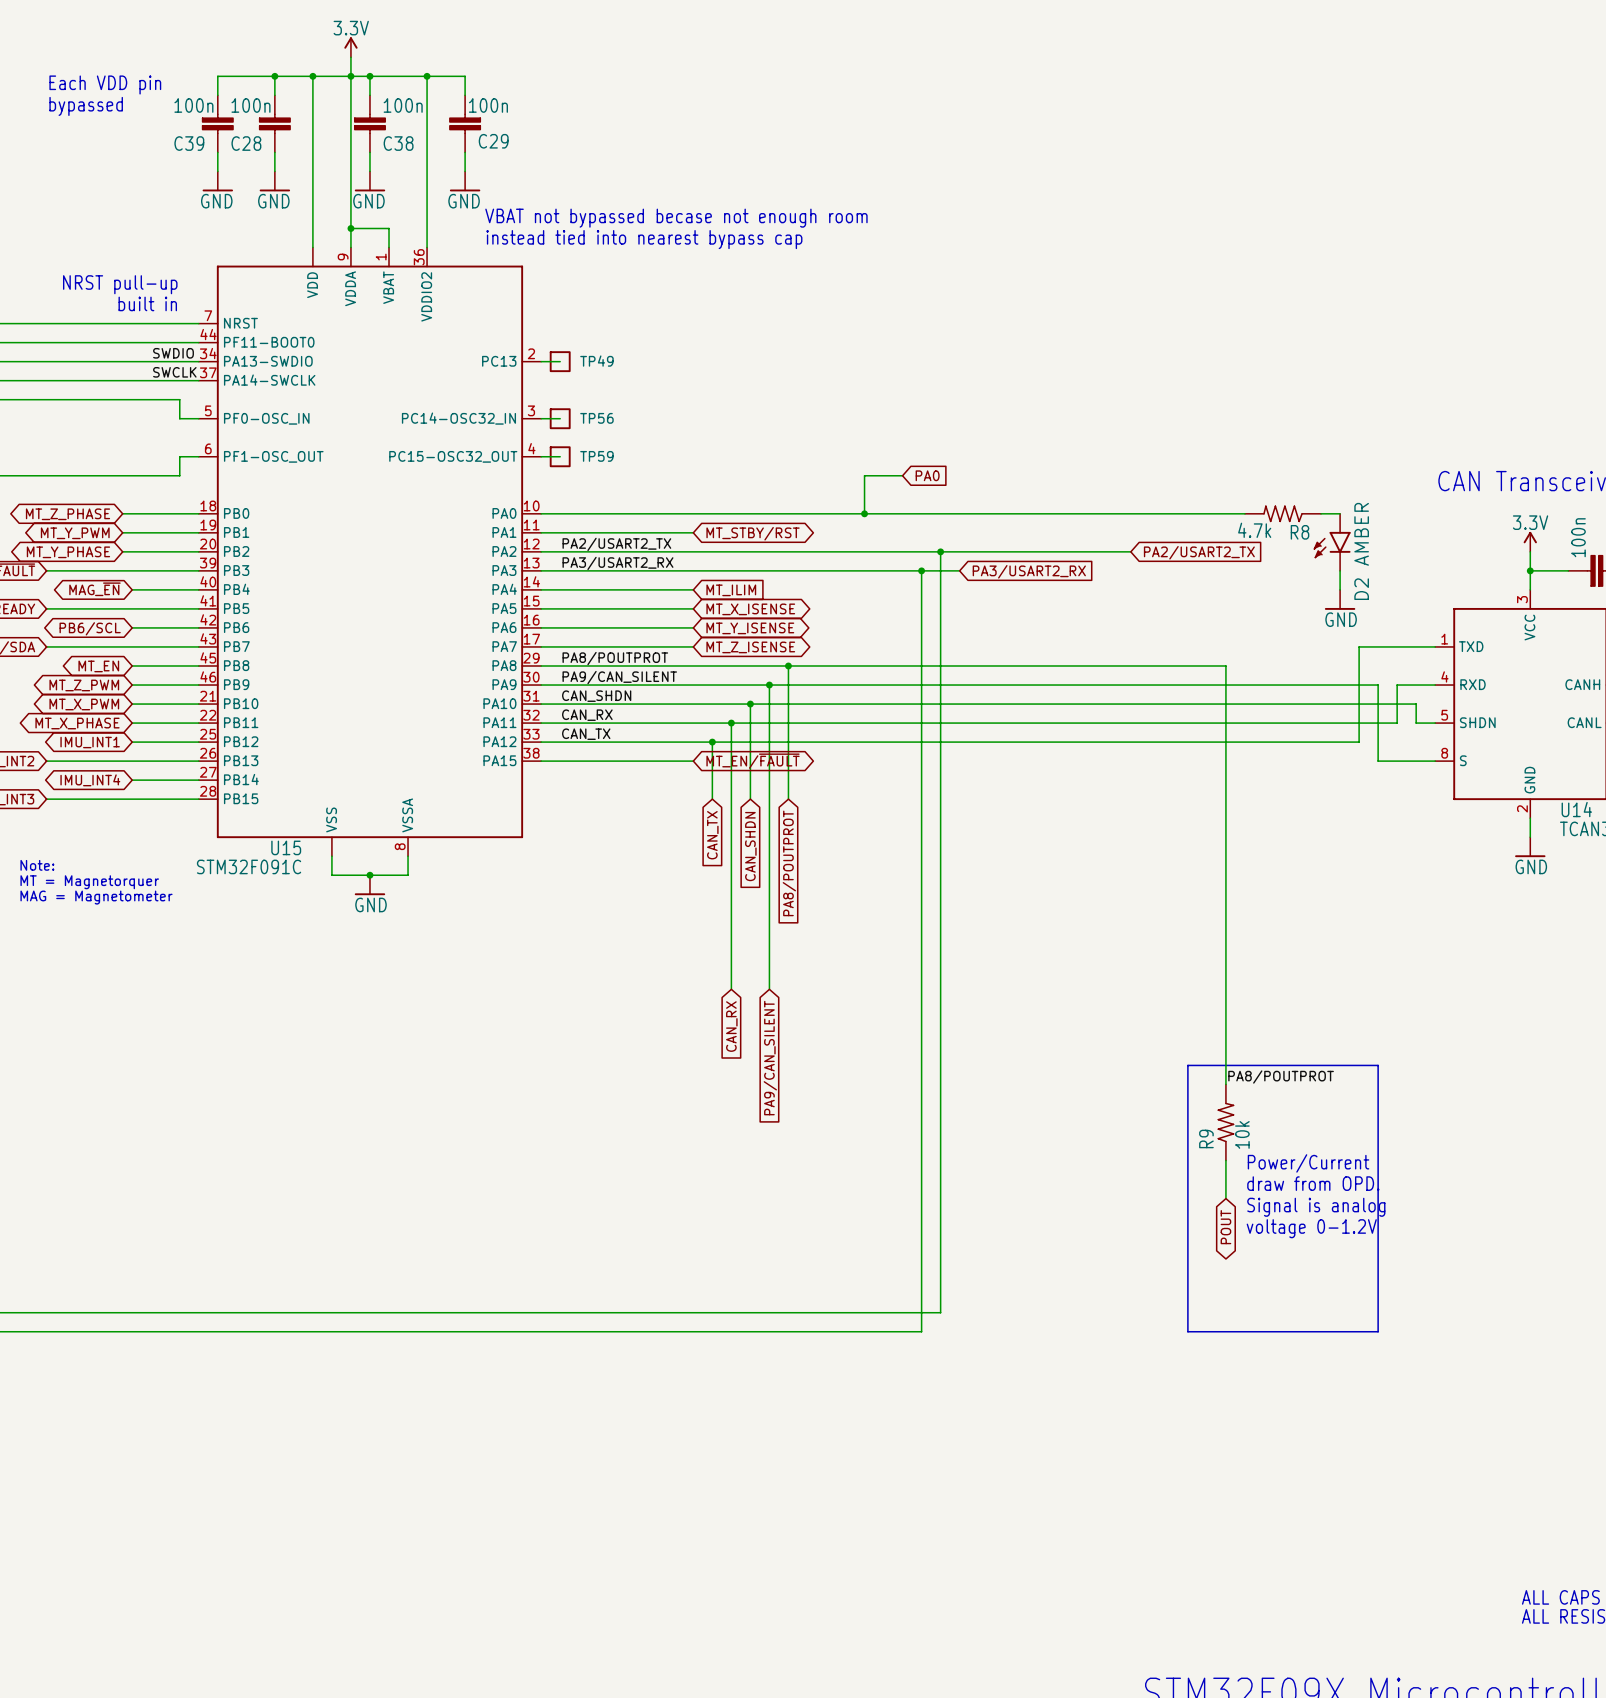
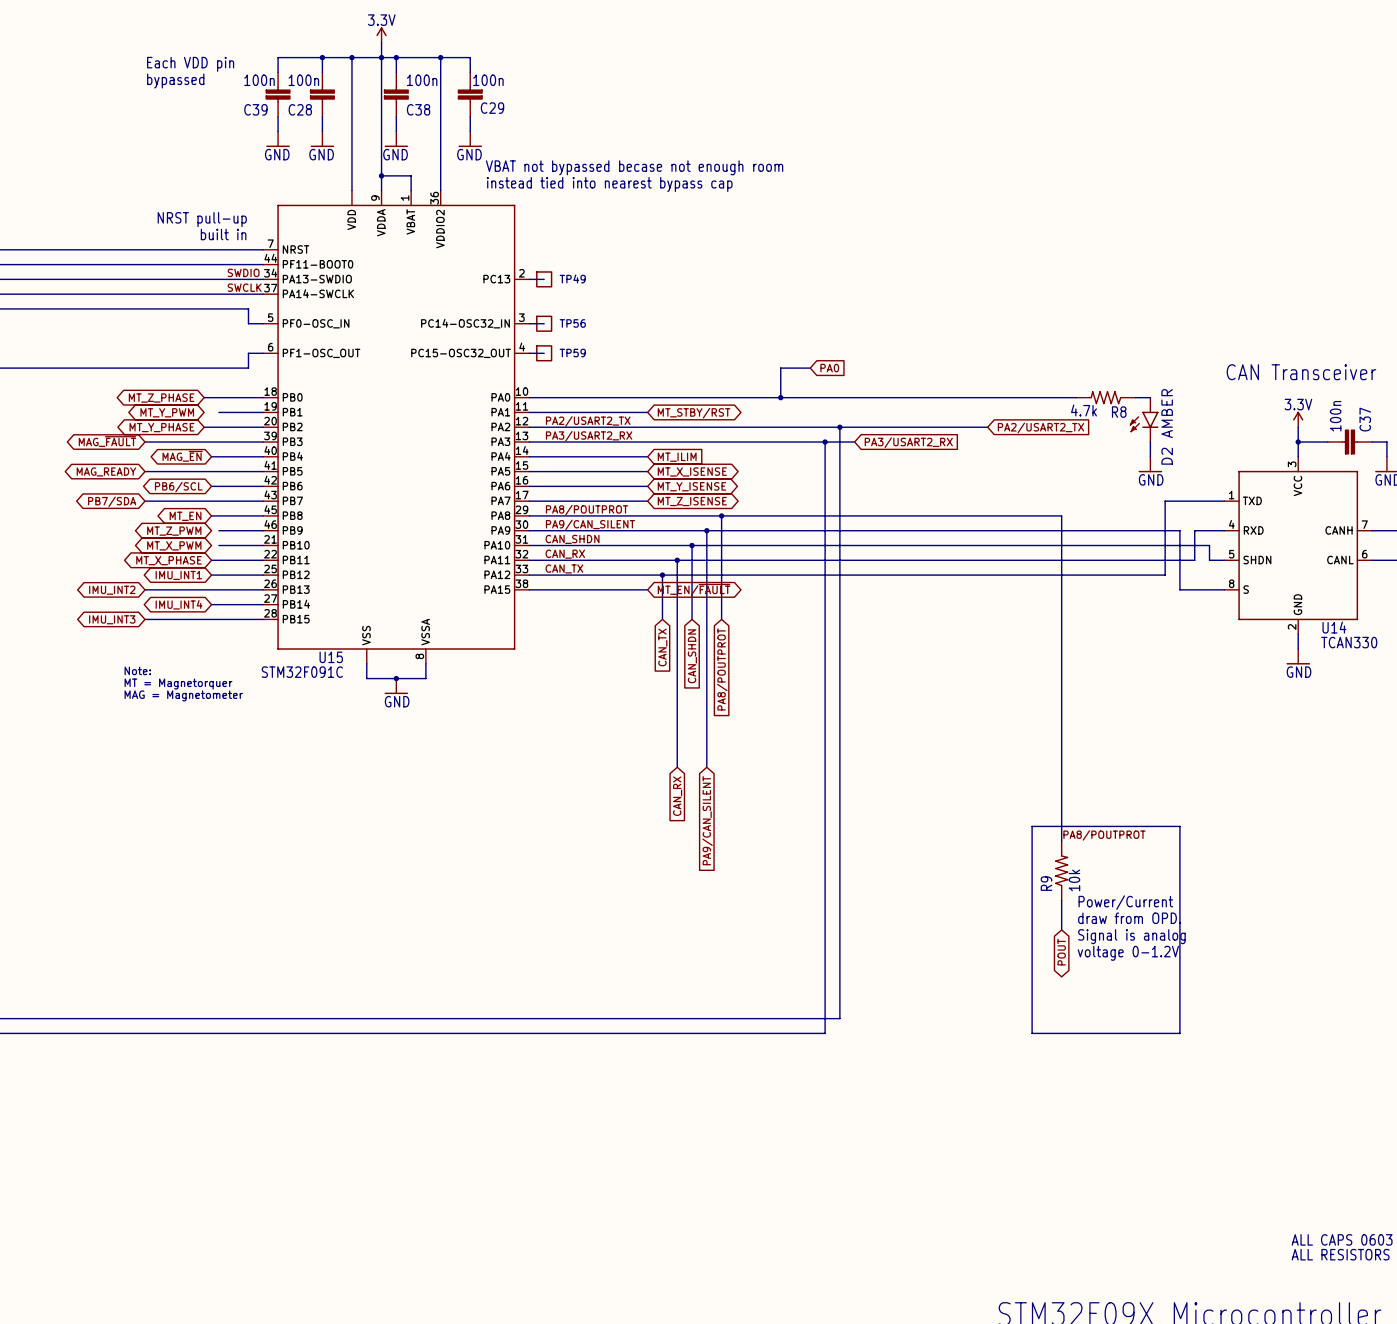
wire: (122, 532) (141, 532) -> none
wire: (132, 685) (141, 685) -> none
wire: (132, 704) (141, 704) -> none

